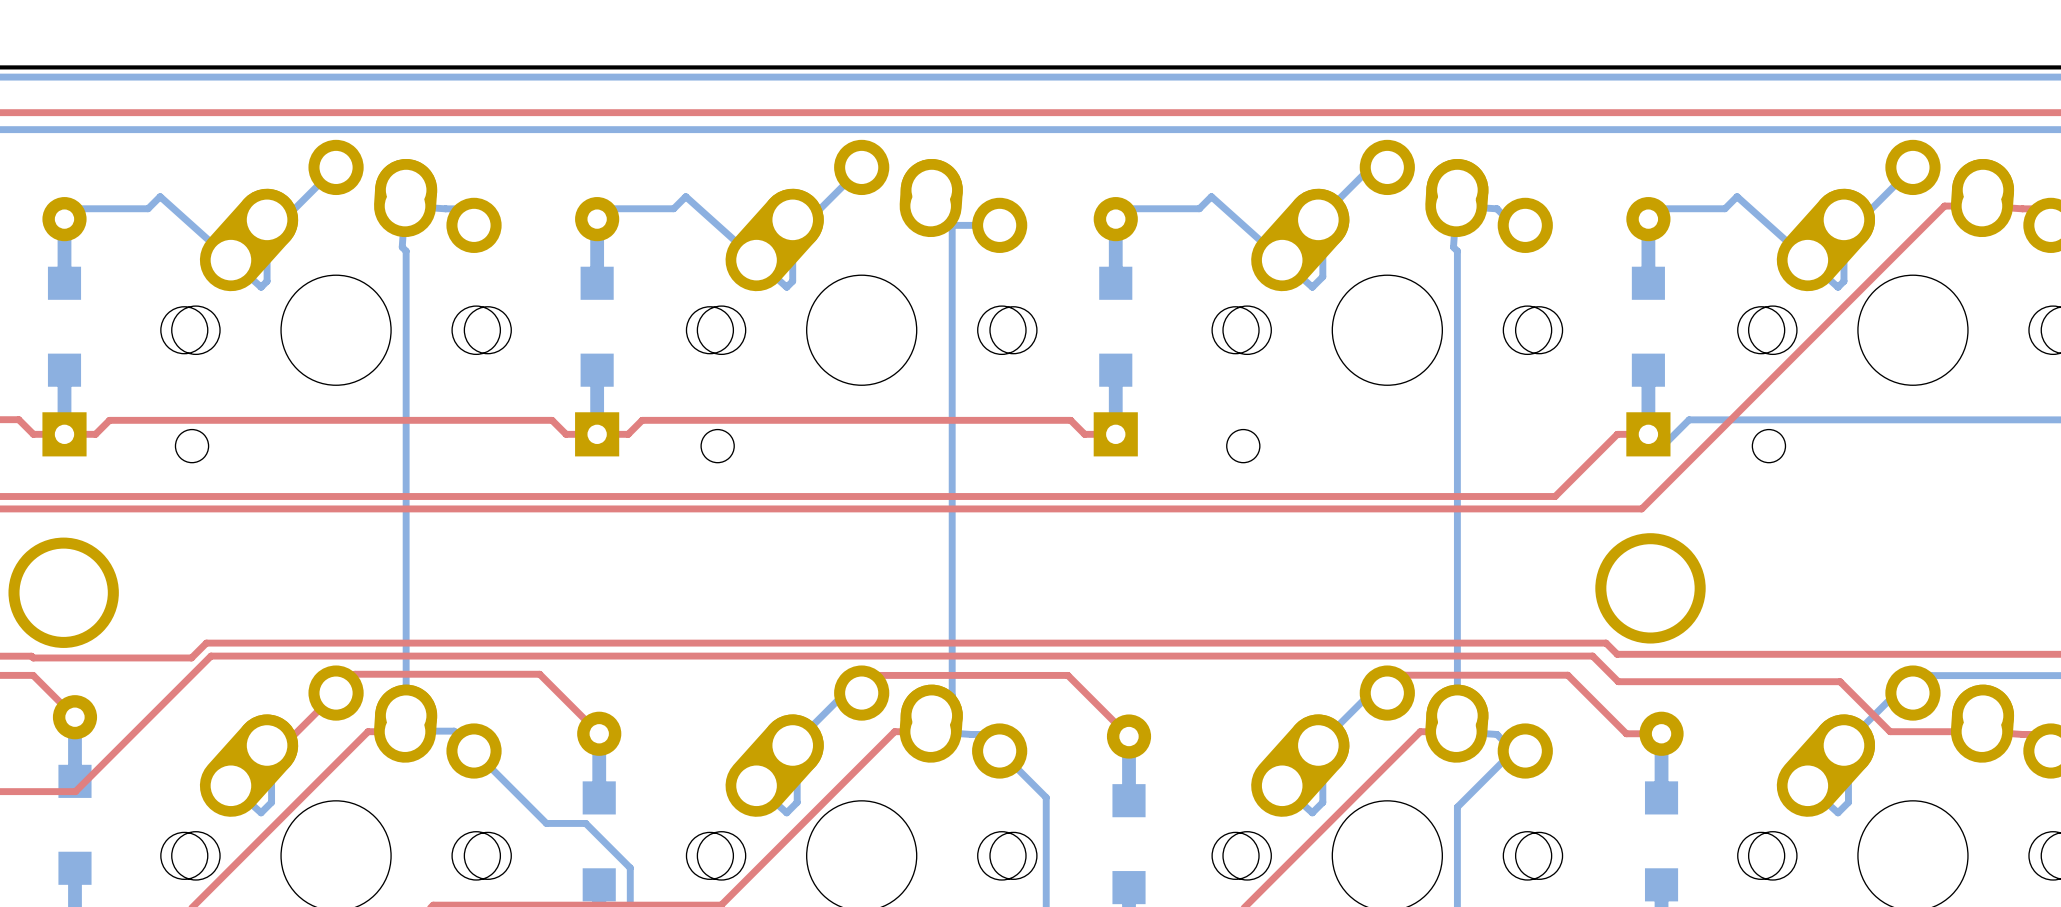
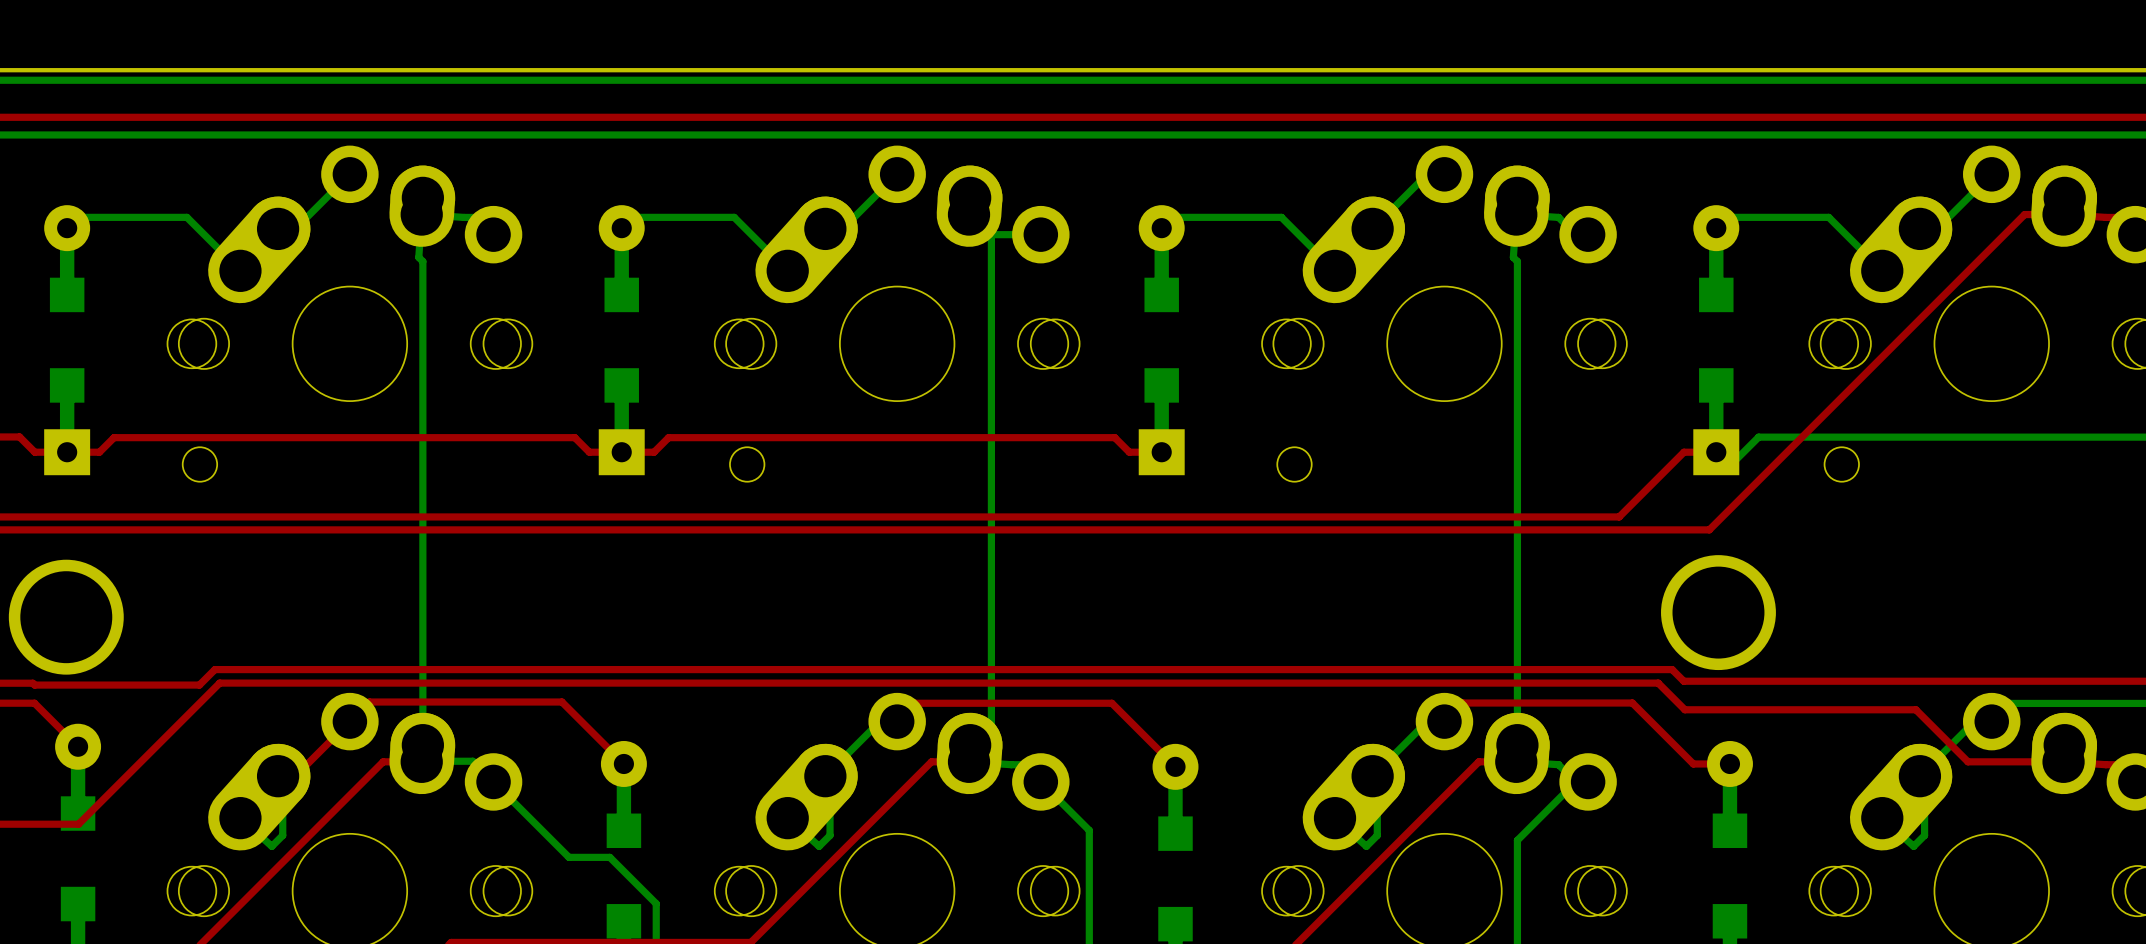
bottom track: (148, 208) (160, 196) (261, 287) (267, 281) (267, 219) -> (154, 217) (186, 217) (240, 270) (240, 266) (278, 228)
bottom track: (673, 208) (685, 196) (786, 287) (792, 281) (792, 219) -> (701, 217) (734, 217) (787, 270) (787, 266) (825, 228)
bottom track: (1199, 208) (1211, 196) (1312, 287) (1322, 276) (1322, 242) -> (1248, 217) (1281, 217) (1335, 270) (1335, 266) (1372, 228)
bottom track: (1725, 208) (1737, 196) (1838, 287) (1843, 281) (1843, 219) -> (1796, 217) (1828, 217) (1882, 270) (1882, 266) (1919, 228)

